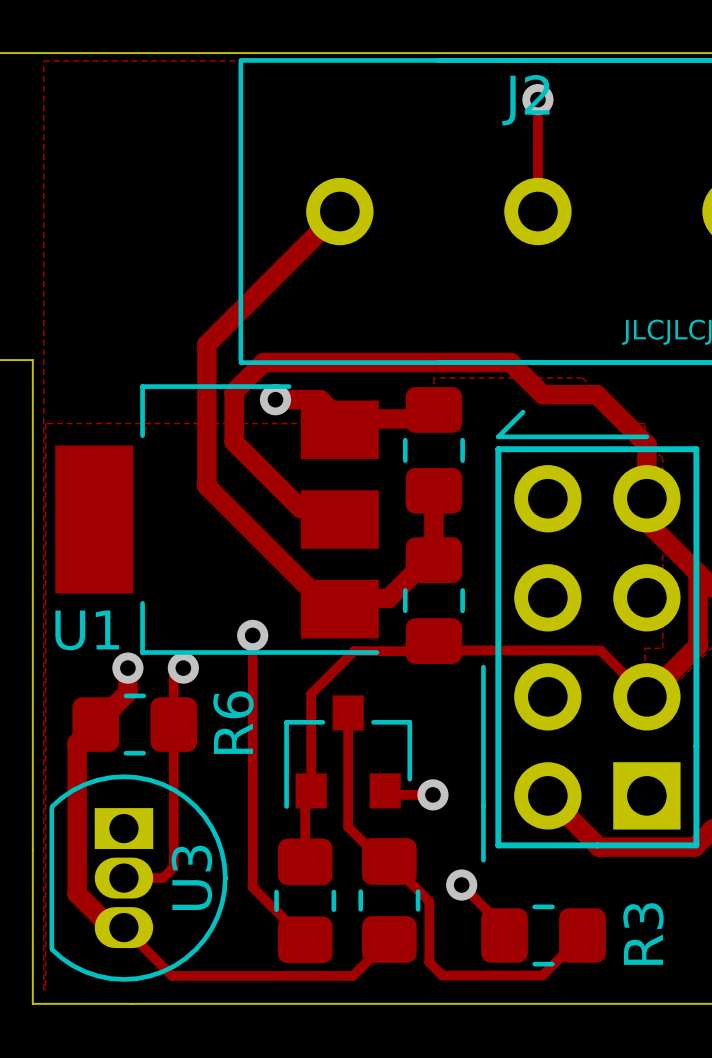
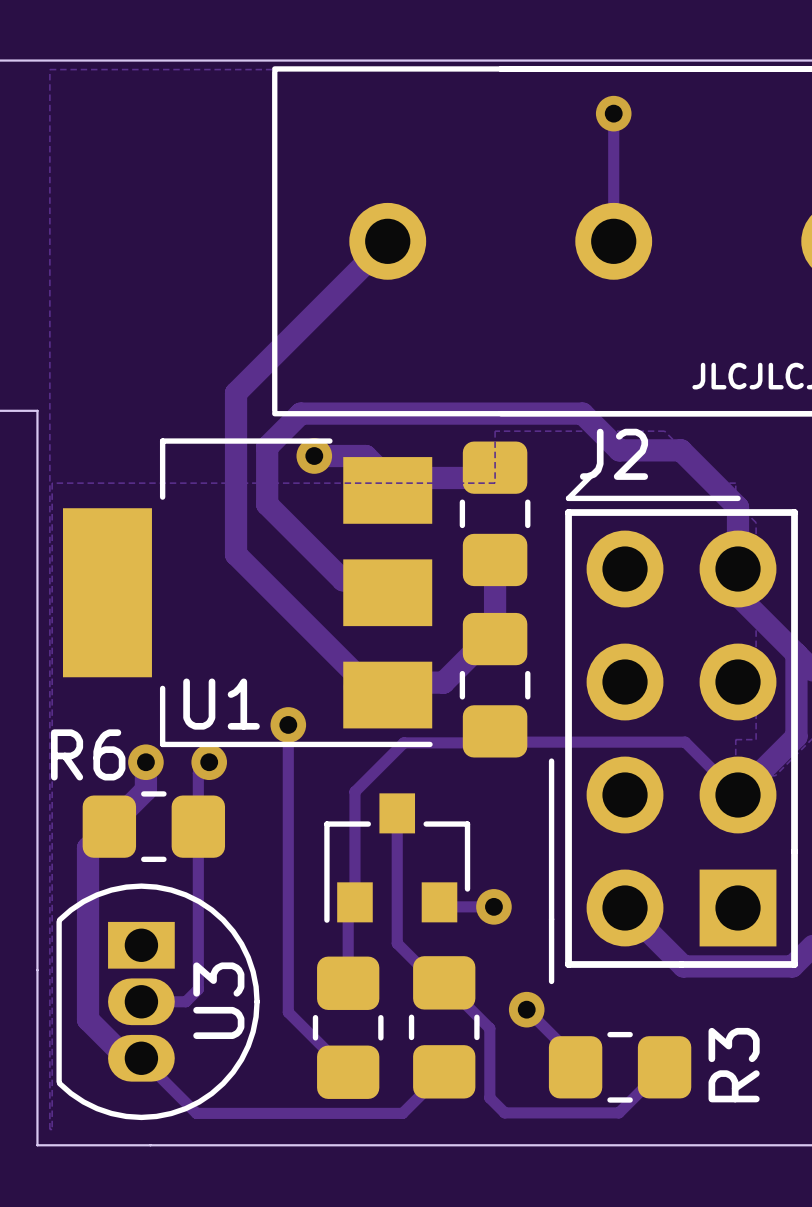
J2 name position: J2 (525, 100) -> J2 (614, 454)
U1 name position: U1 (87, 630) -> U1 (221, 704)
R6 name rotation: 0° (233, 722) -> 90° clockwise (88, 754)
R6 name position: R6 (233, 722) -> R6 (88, 754)

